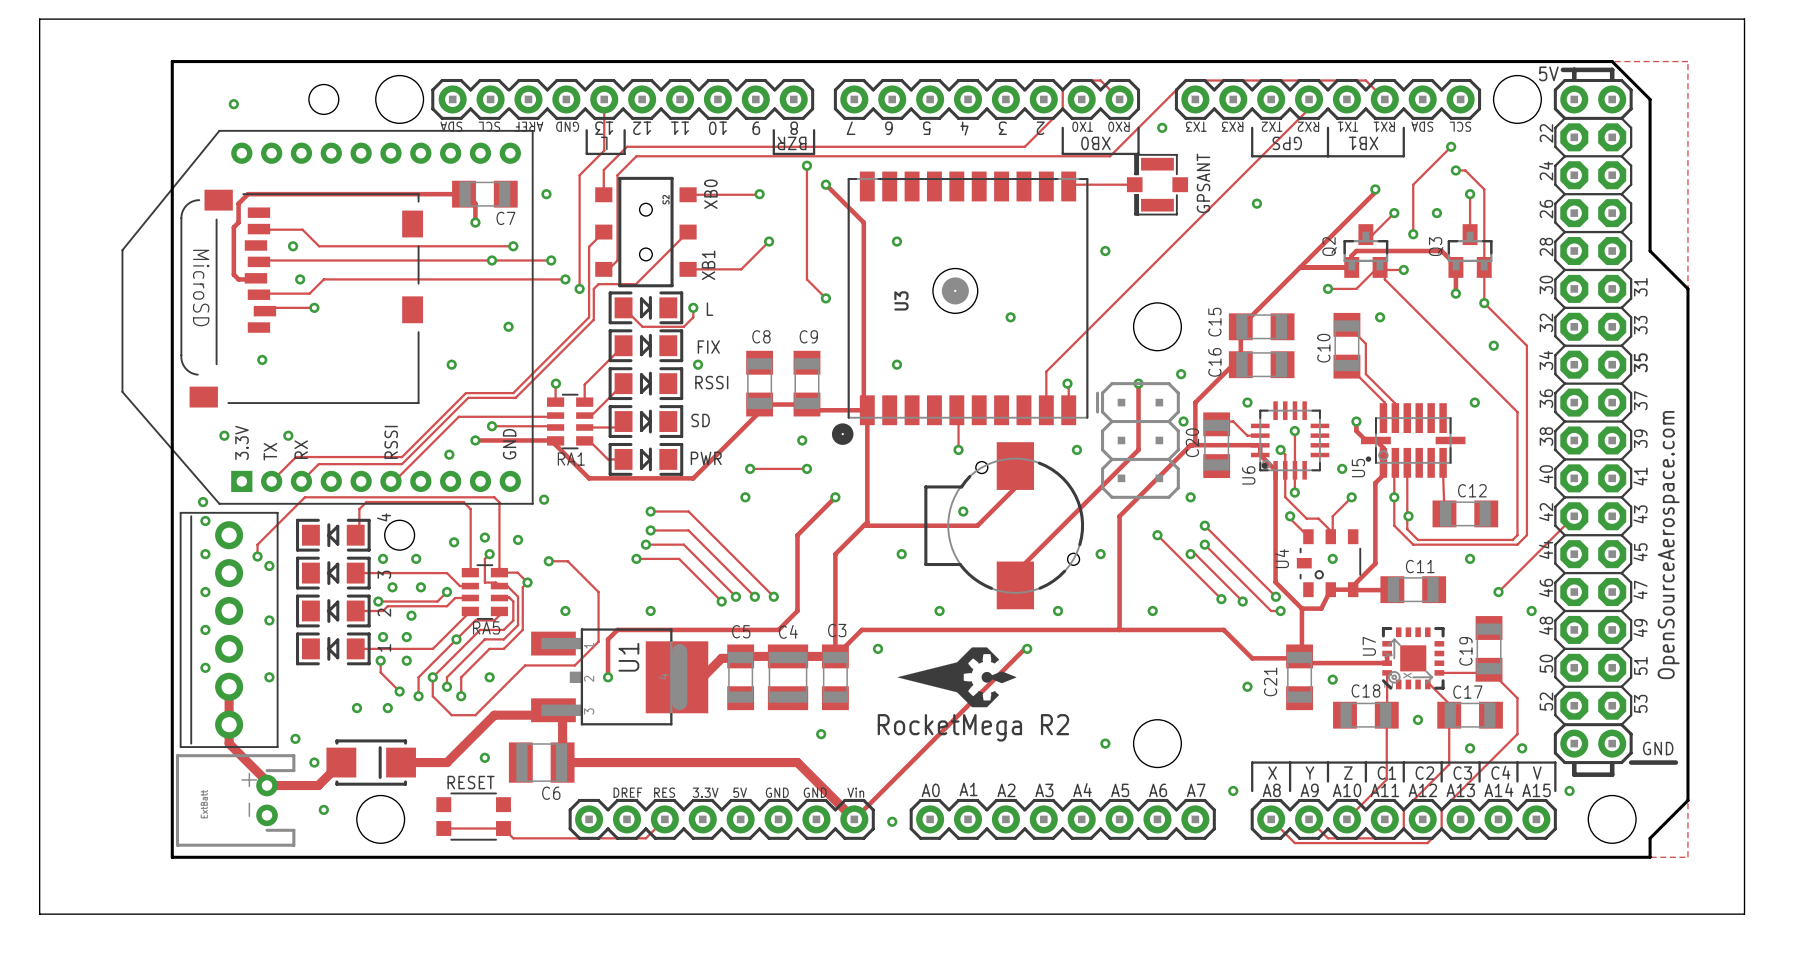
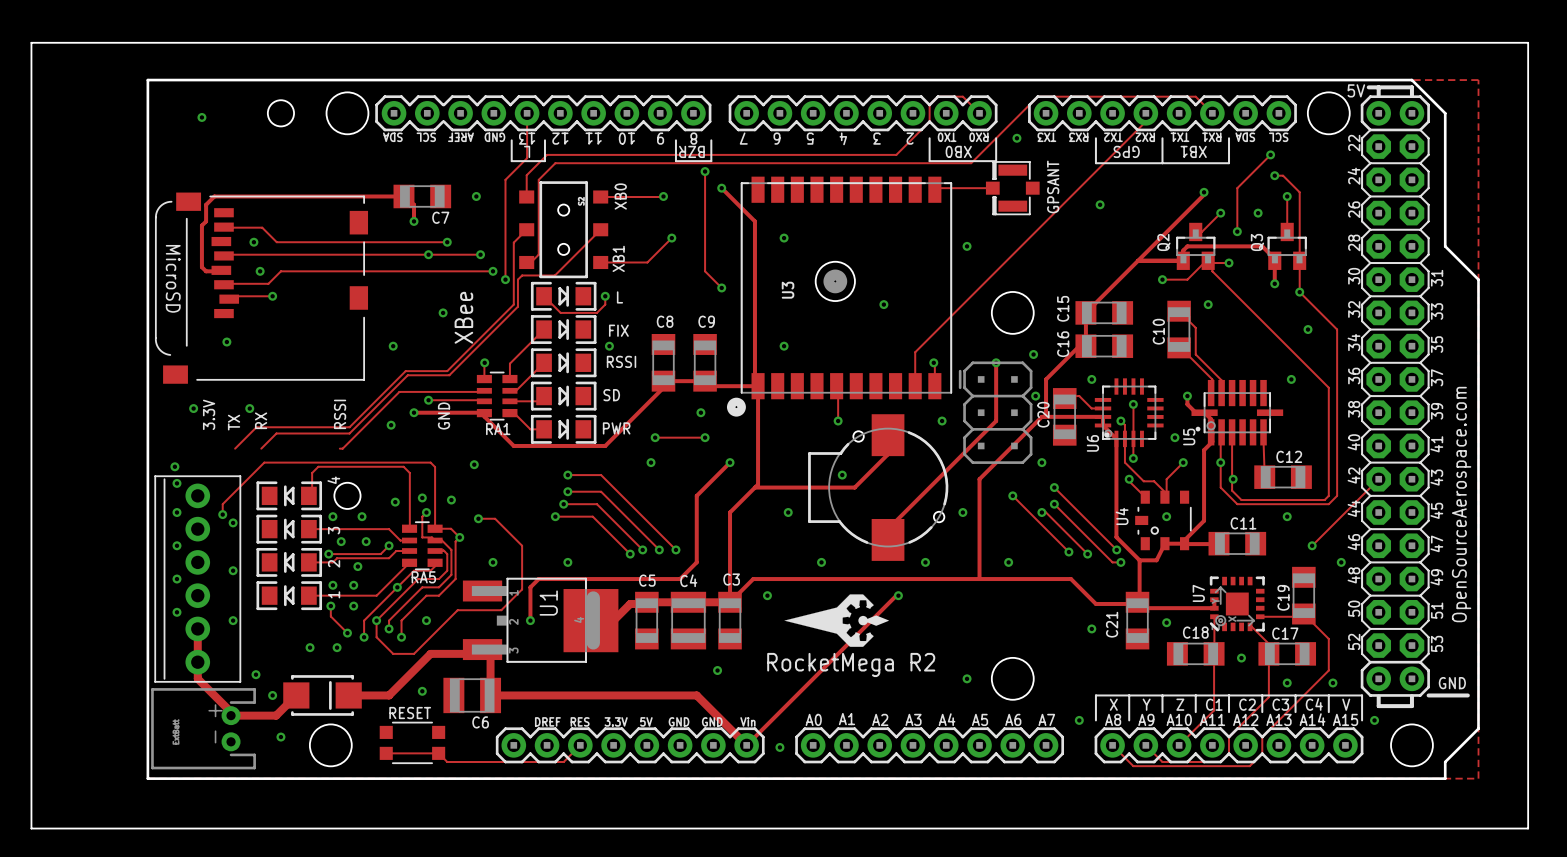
part: (327, 317) -> none
text: none -> XBee (463, 317)

